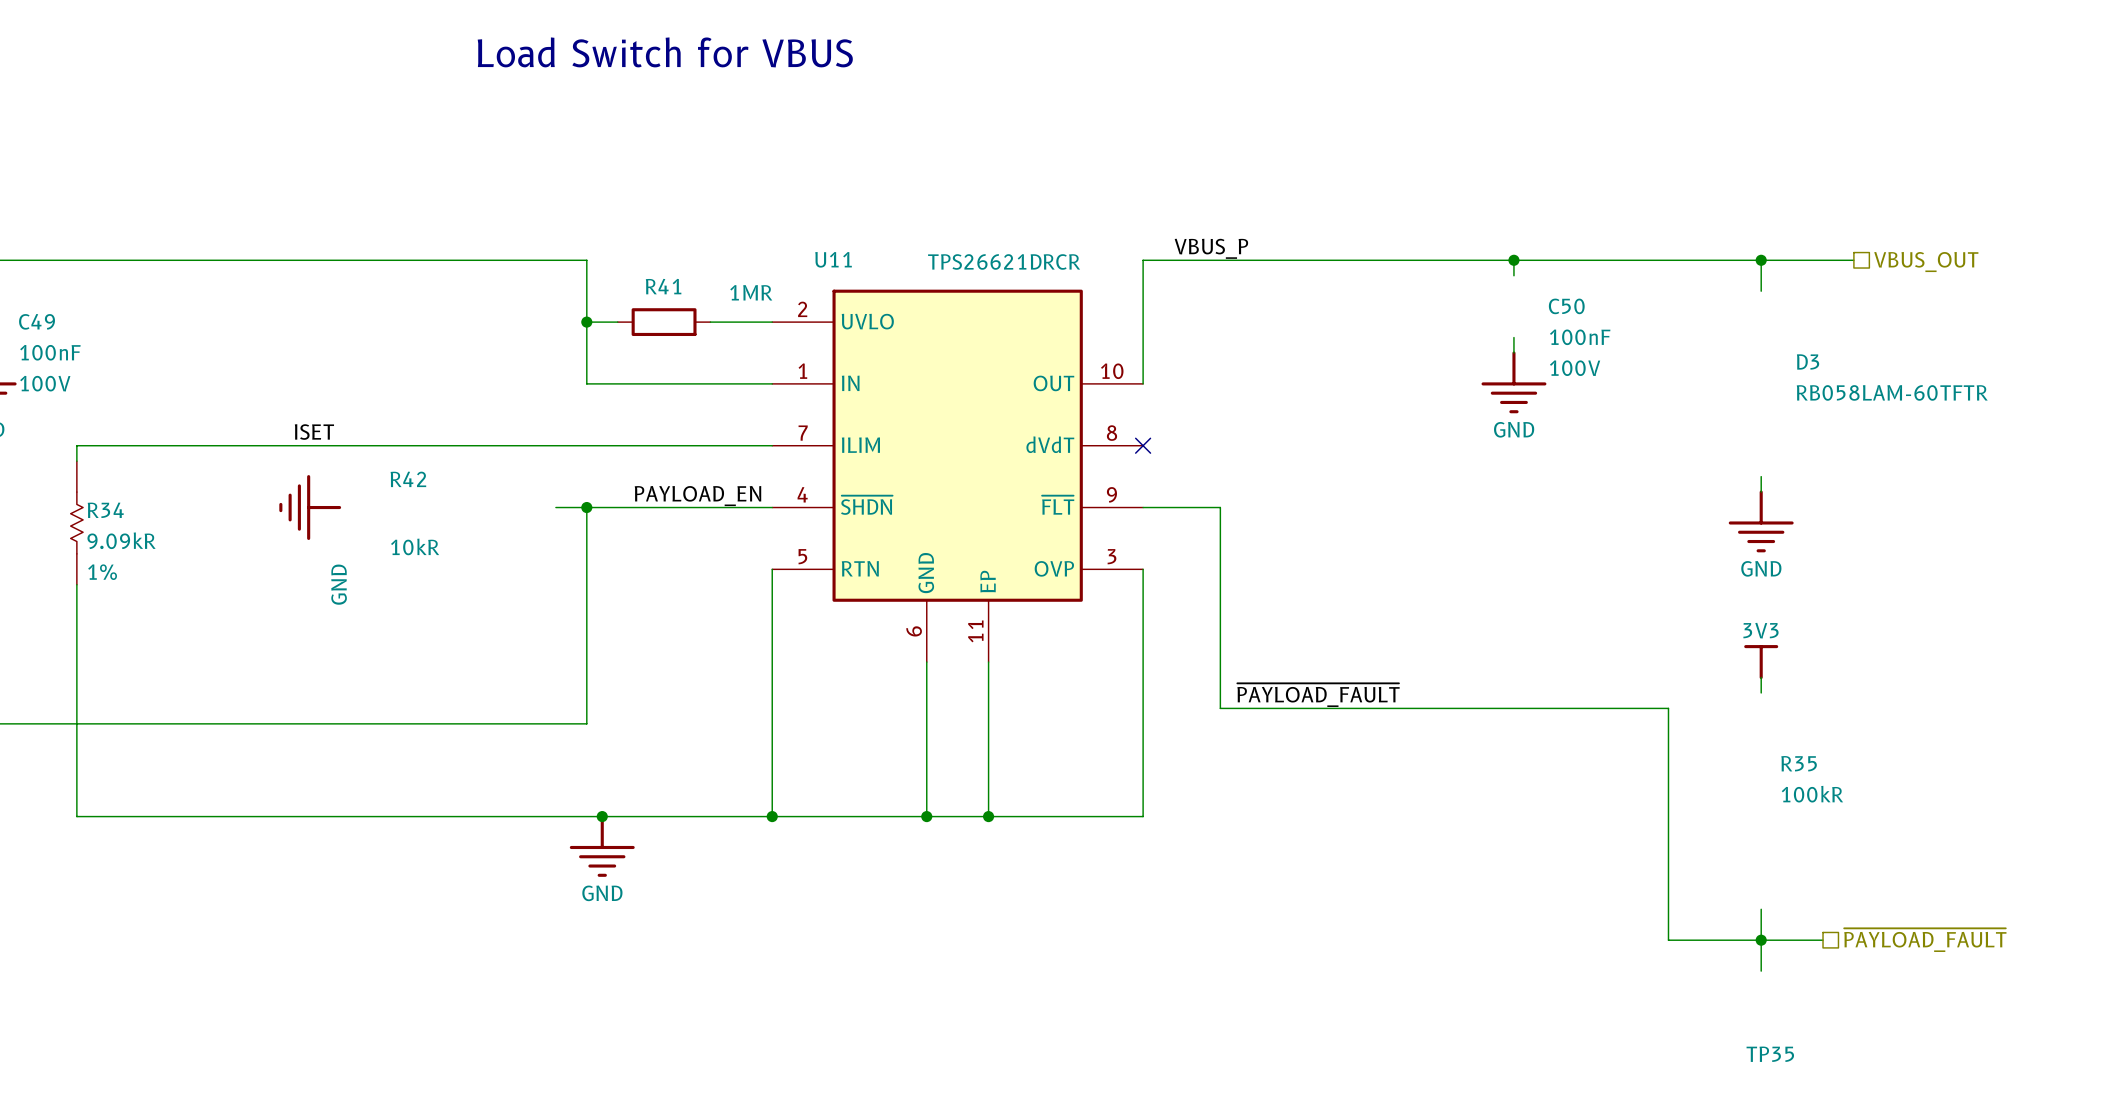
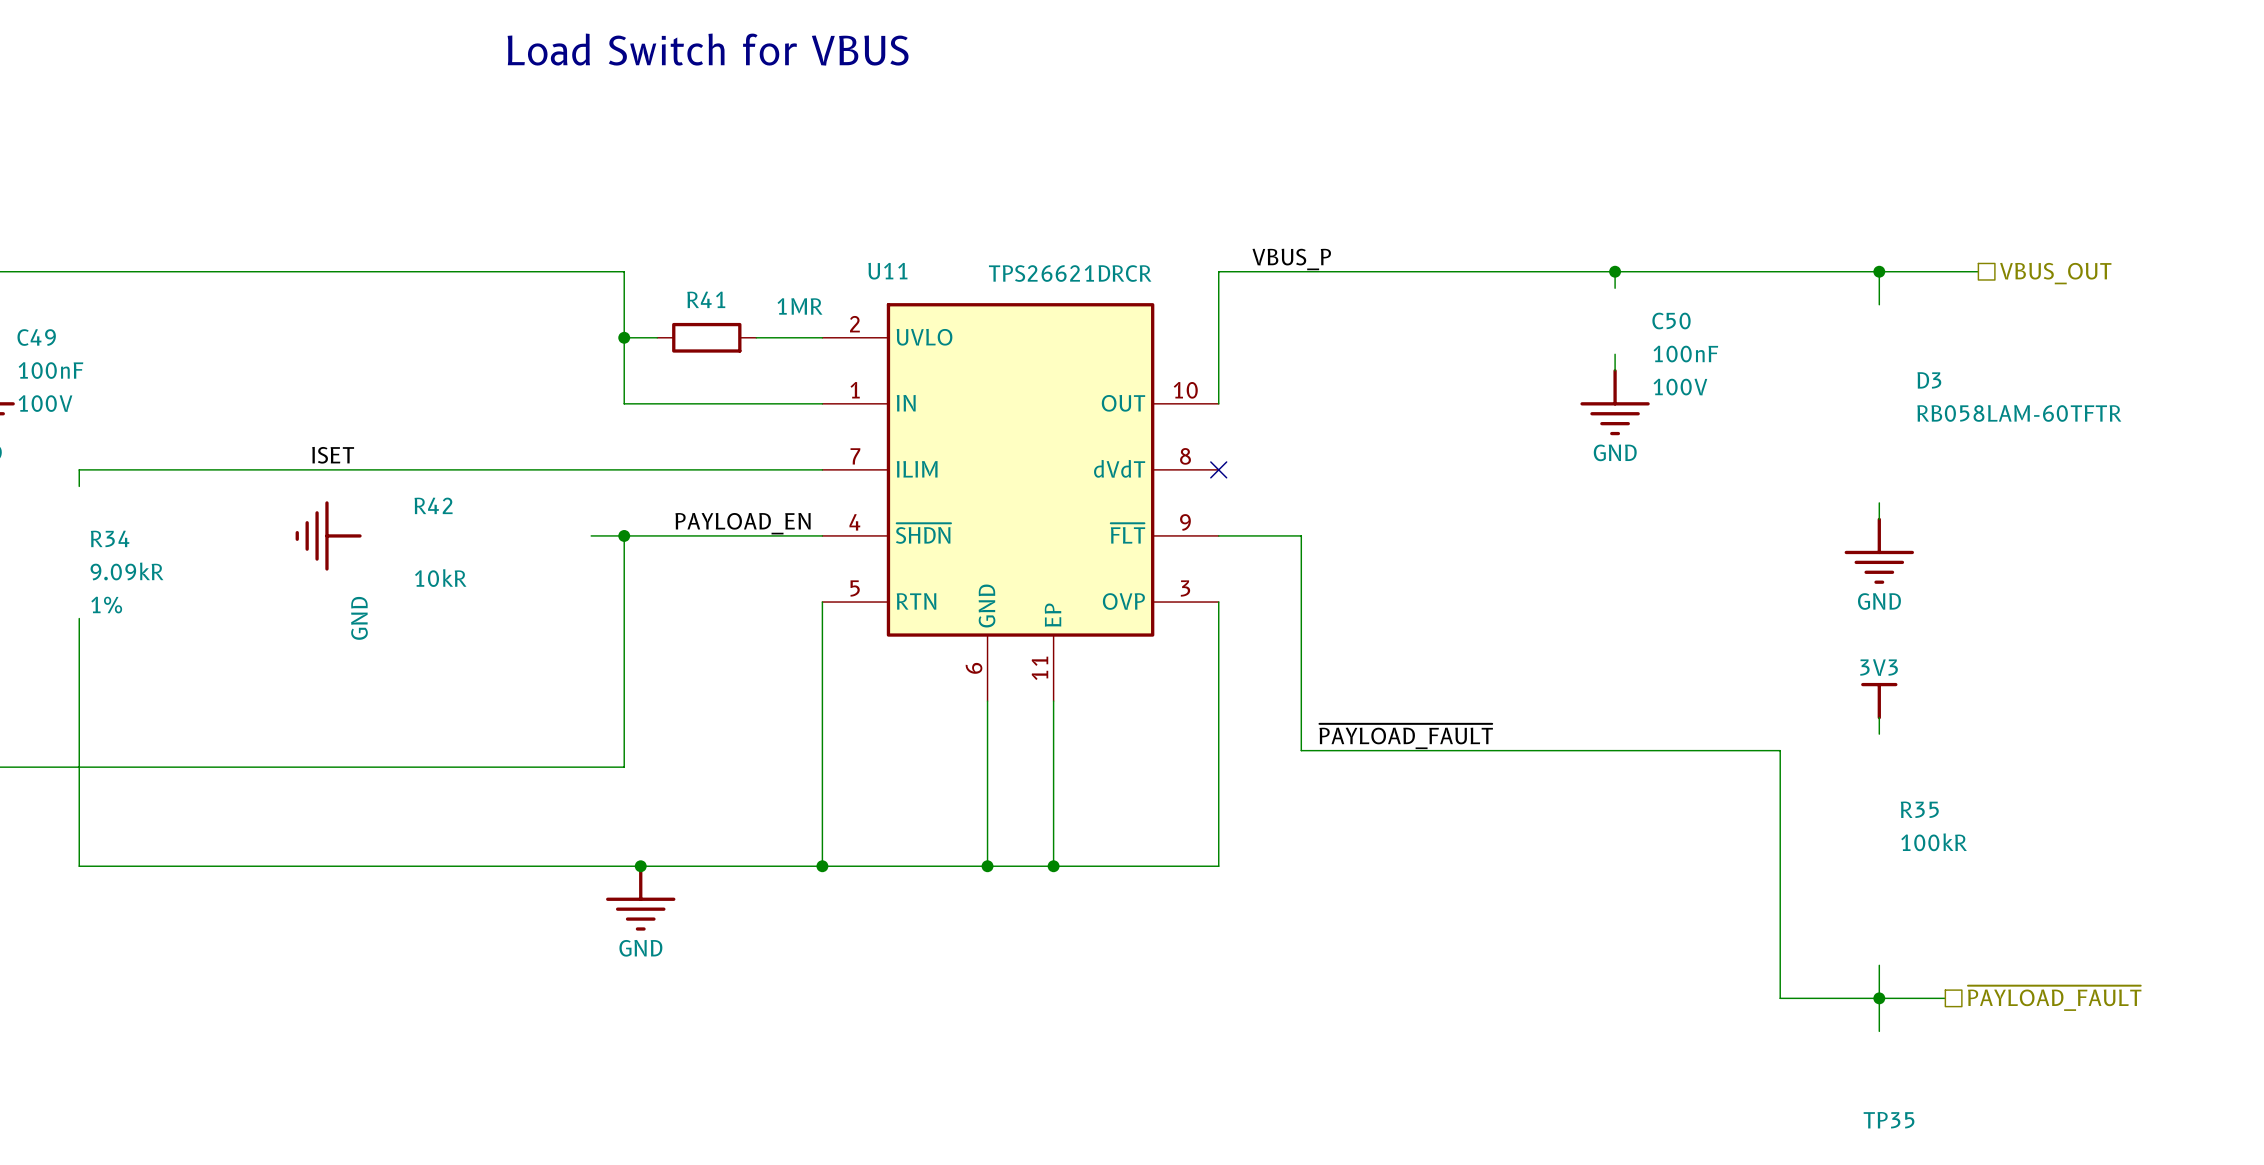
R34 symbol: [70, 461, 84, 585] -> [90, 530, 164, 614]

